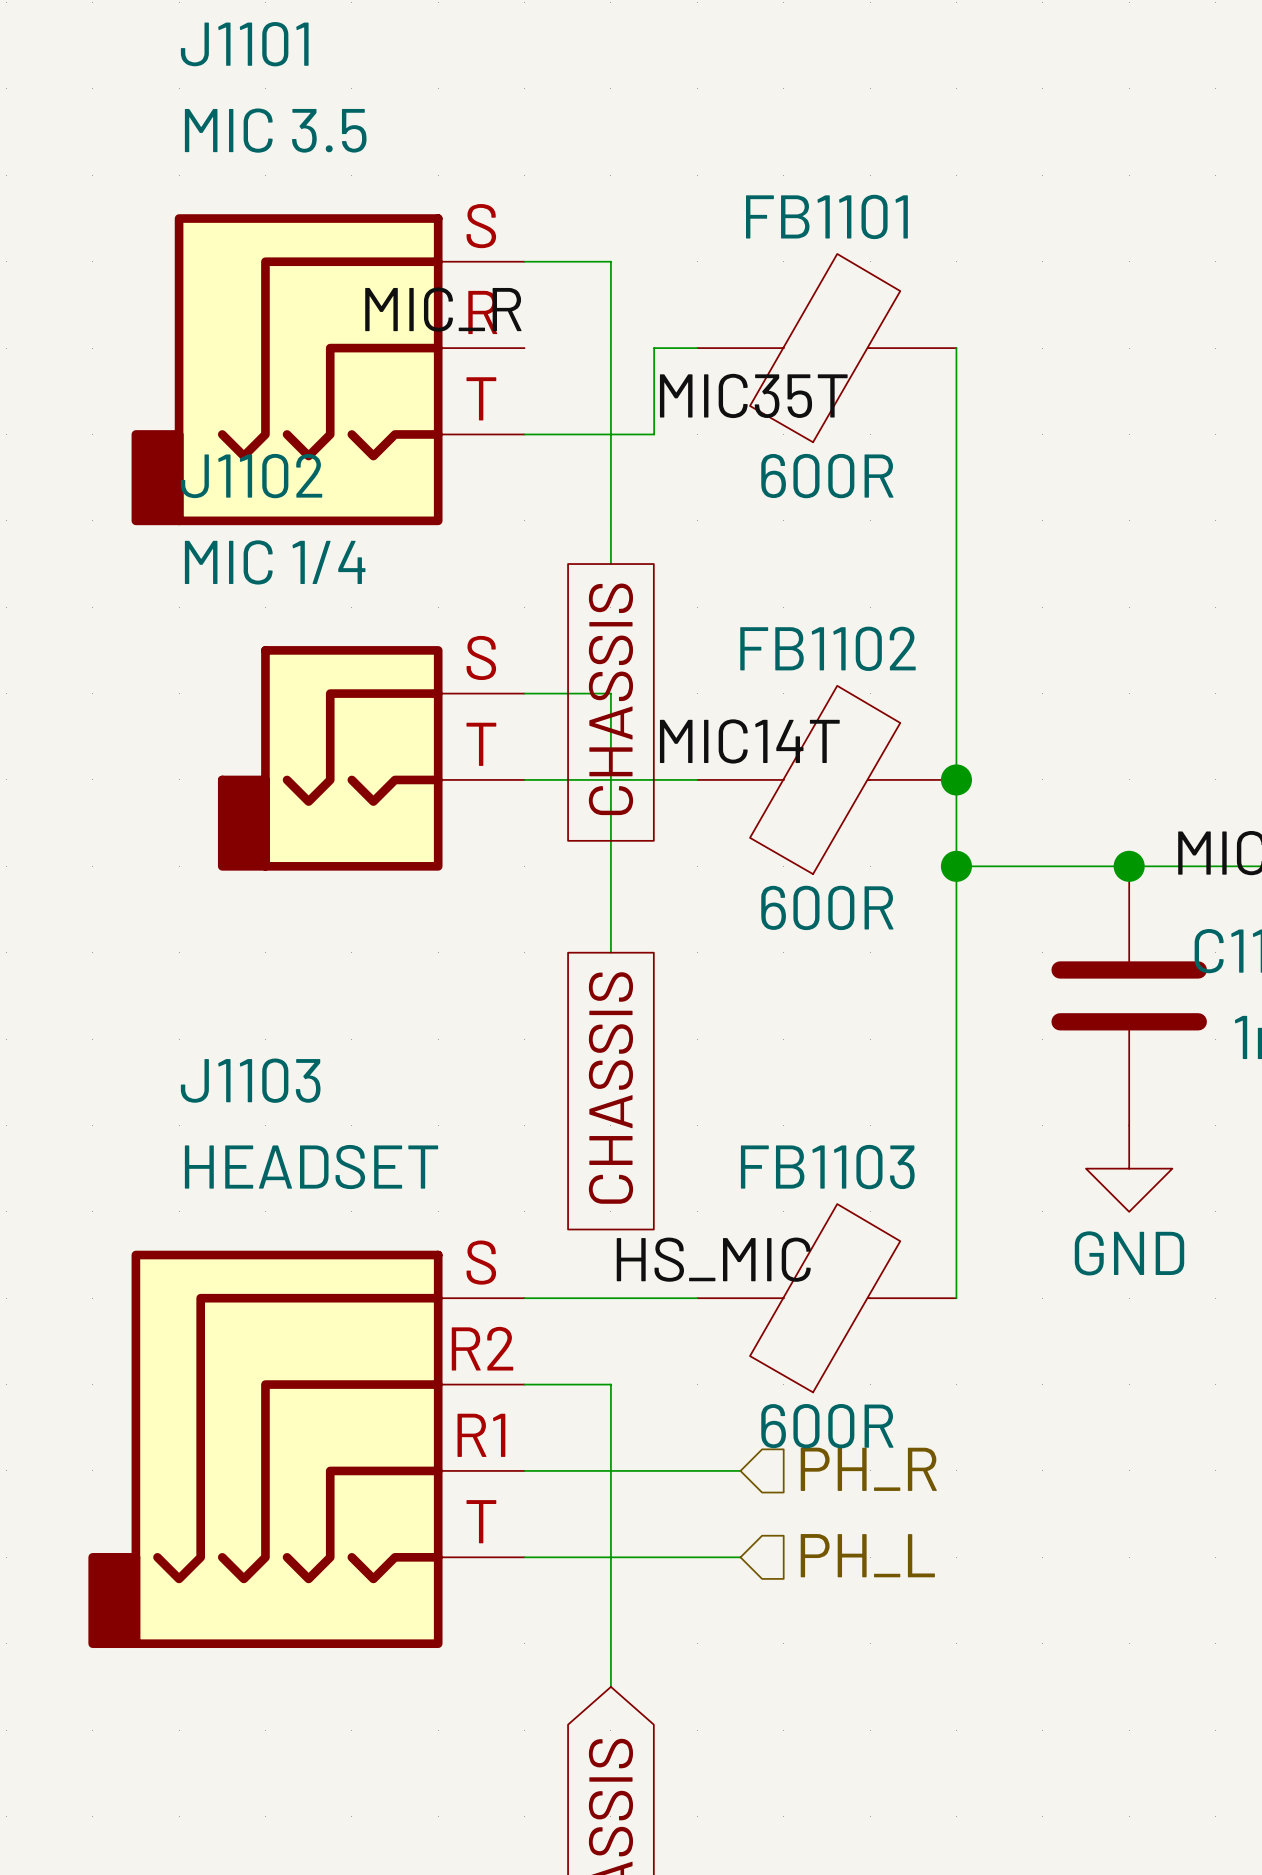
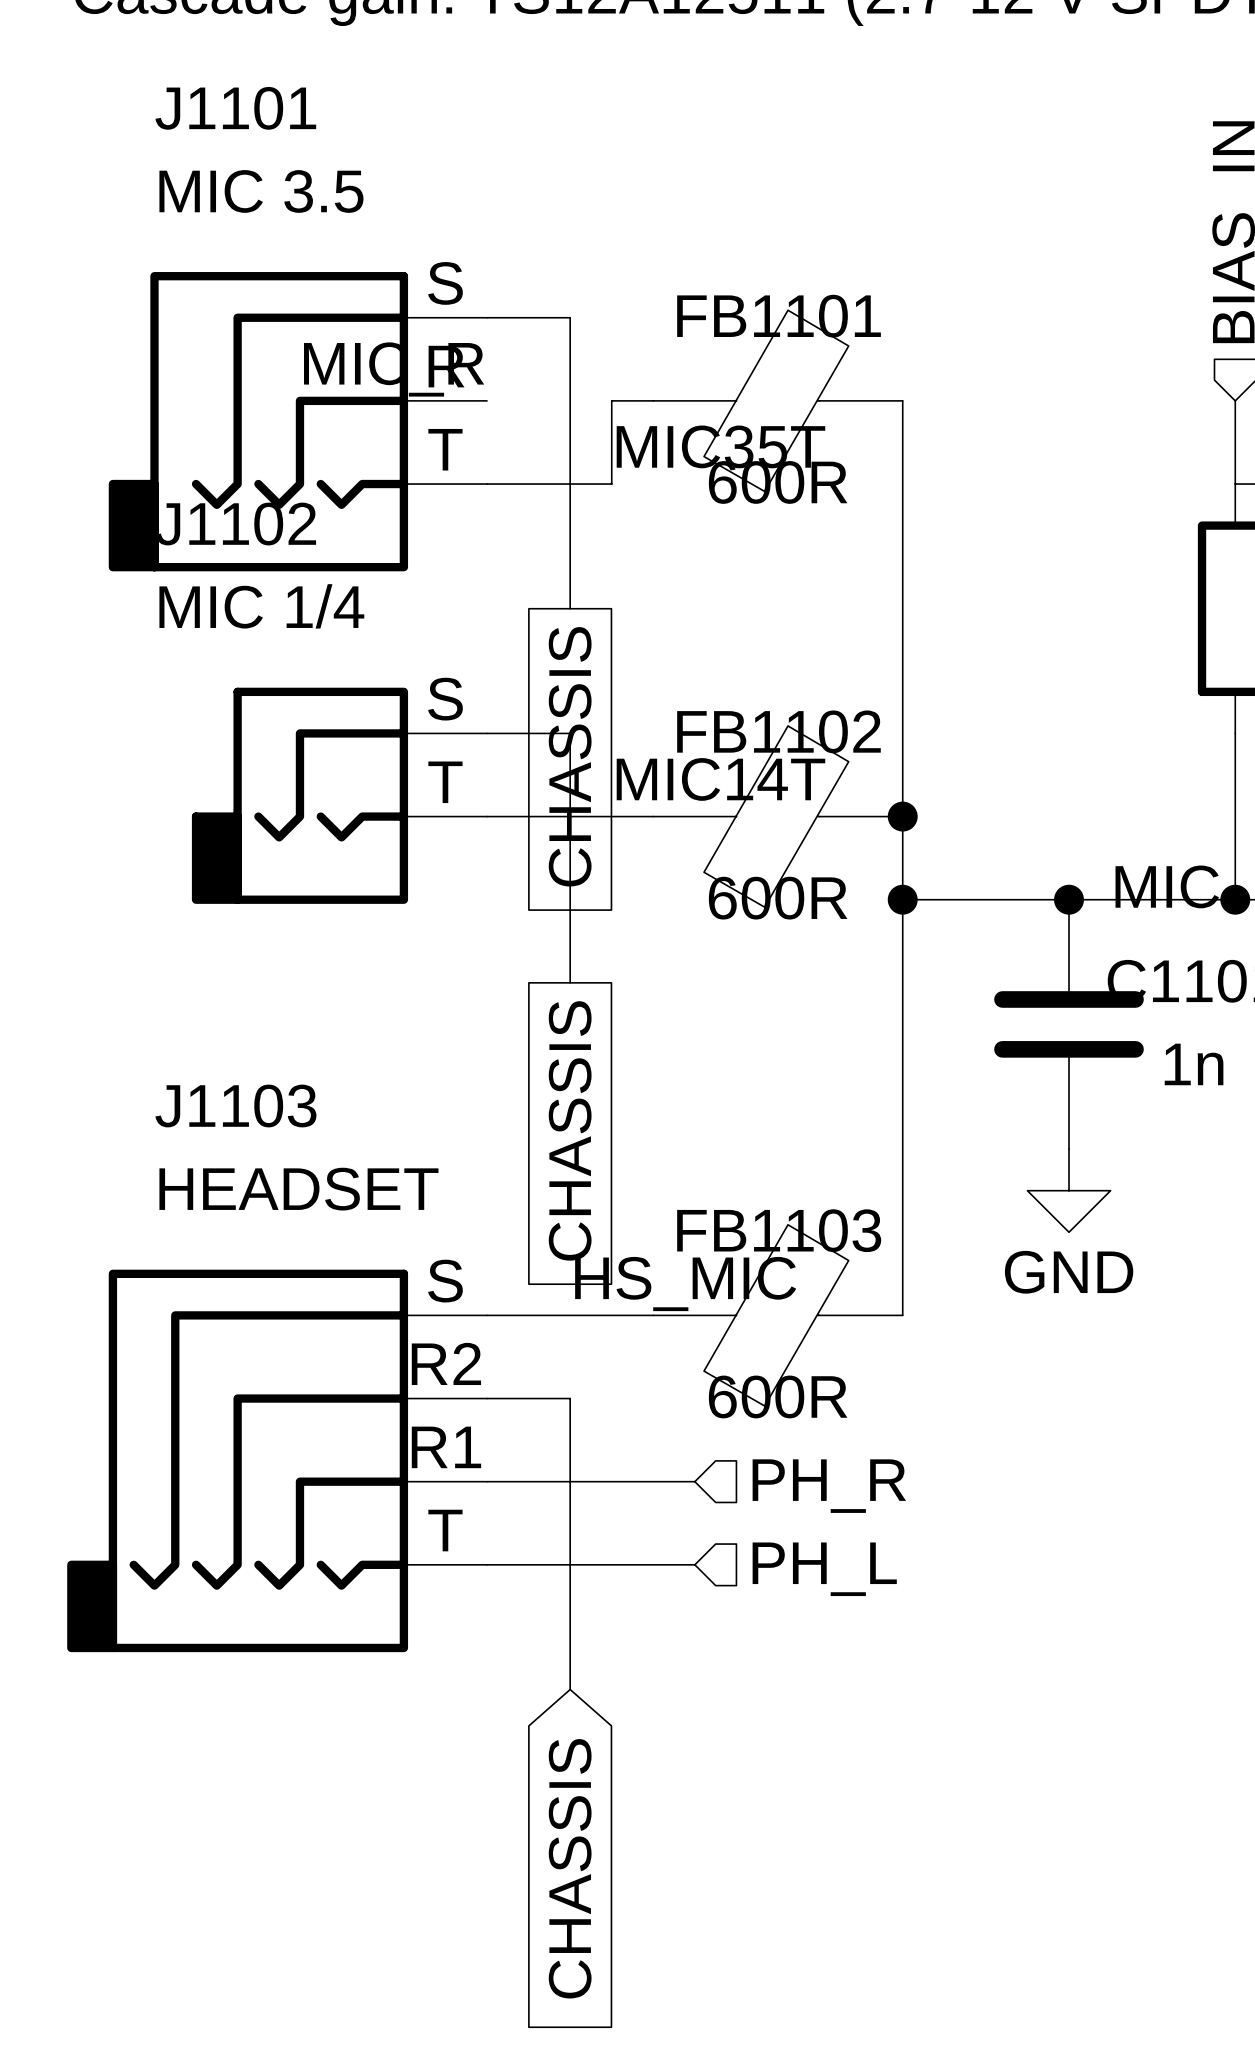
FB1101 name position: FB1101 (826, 216) -> FB1101 (779, 316)
FB1101 value position: 600R (827, 476) -> 600R (778, 482)
FB1102 name position: FB1102 (827, 648) -> FB1102 (778, 731)
FB1102 value position: 600R (827, 907) -> 600R (778, 898)
FB1103 name position: FB1103 (827, 1167) -> FB1103 (779, 1230)
FB1103 value position: 600R (827, 1426) -> 600R (778, 1396)

